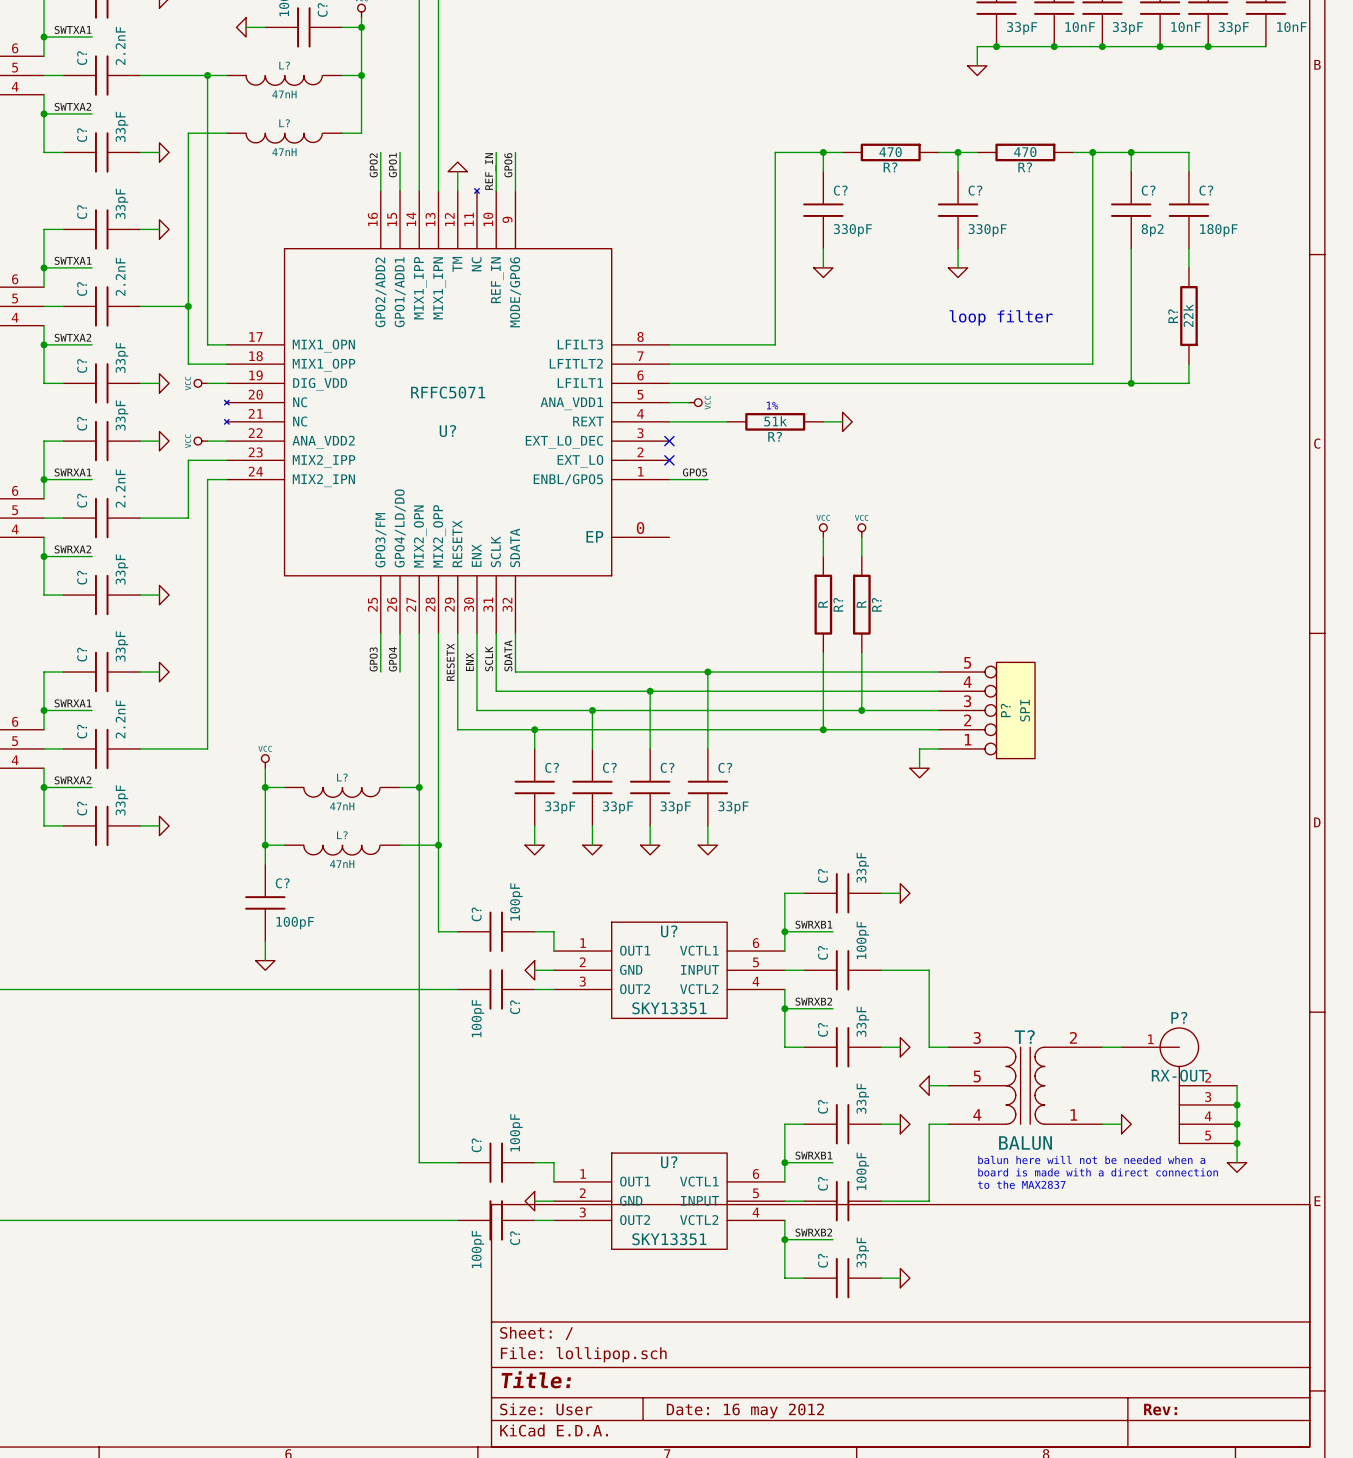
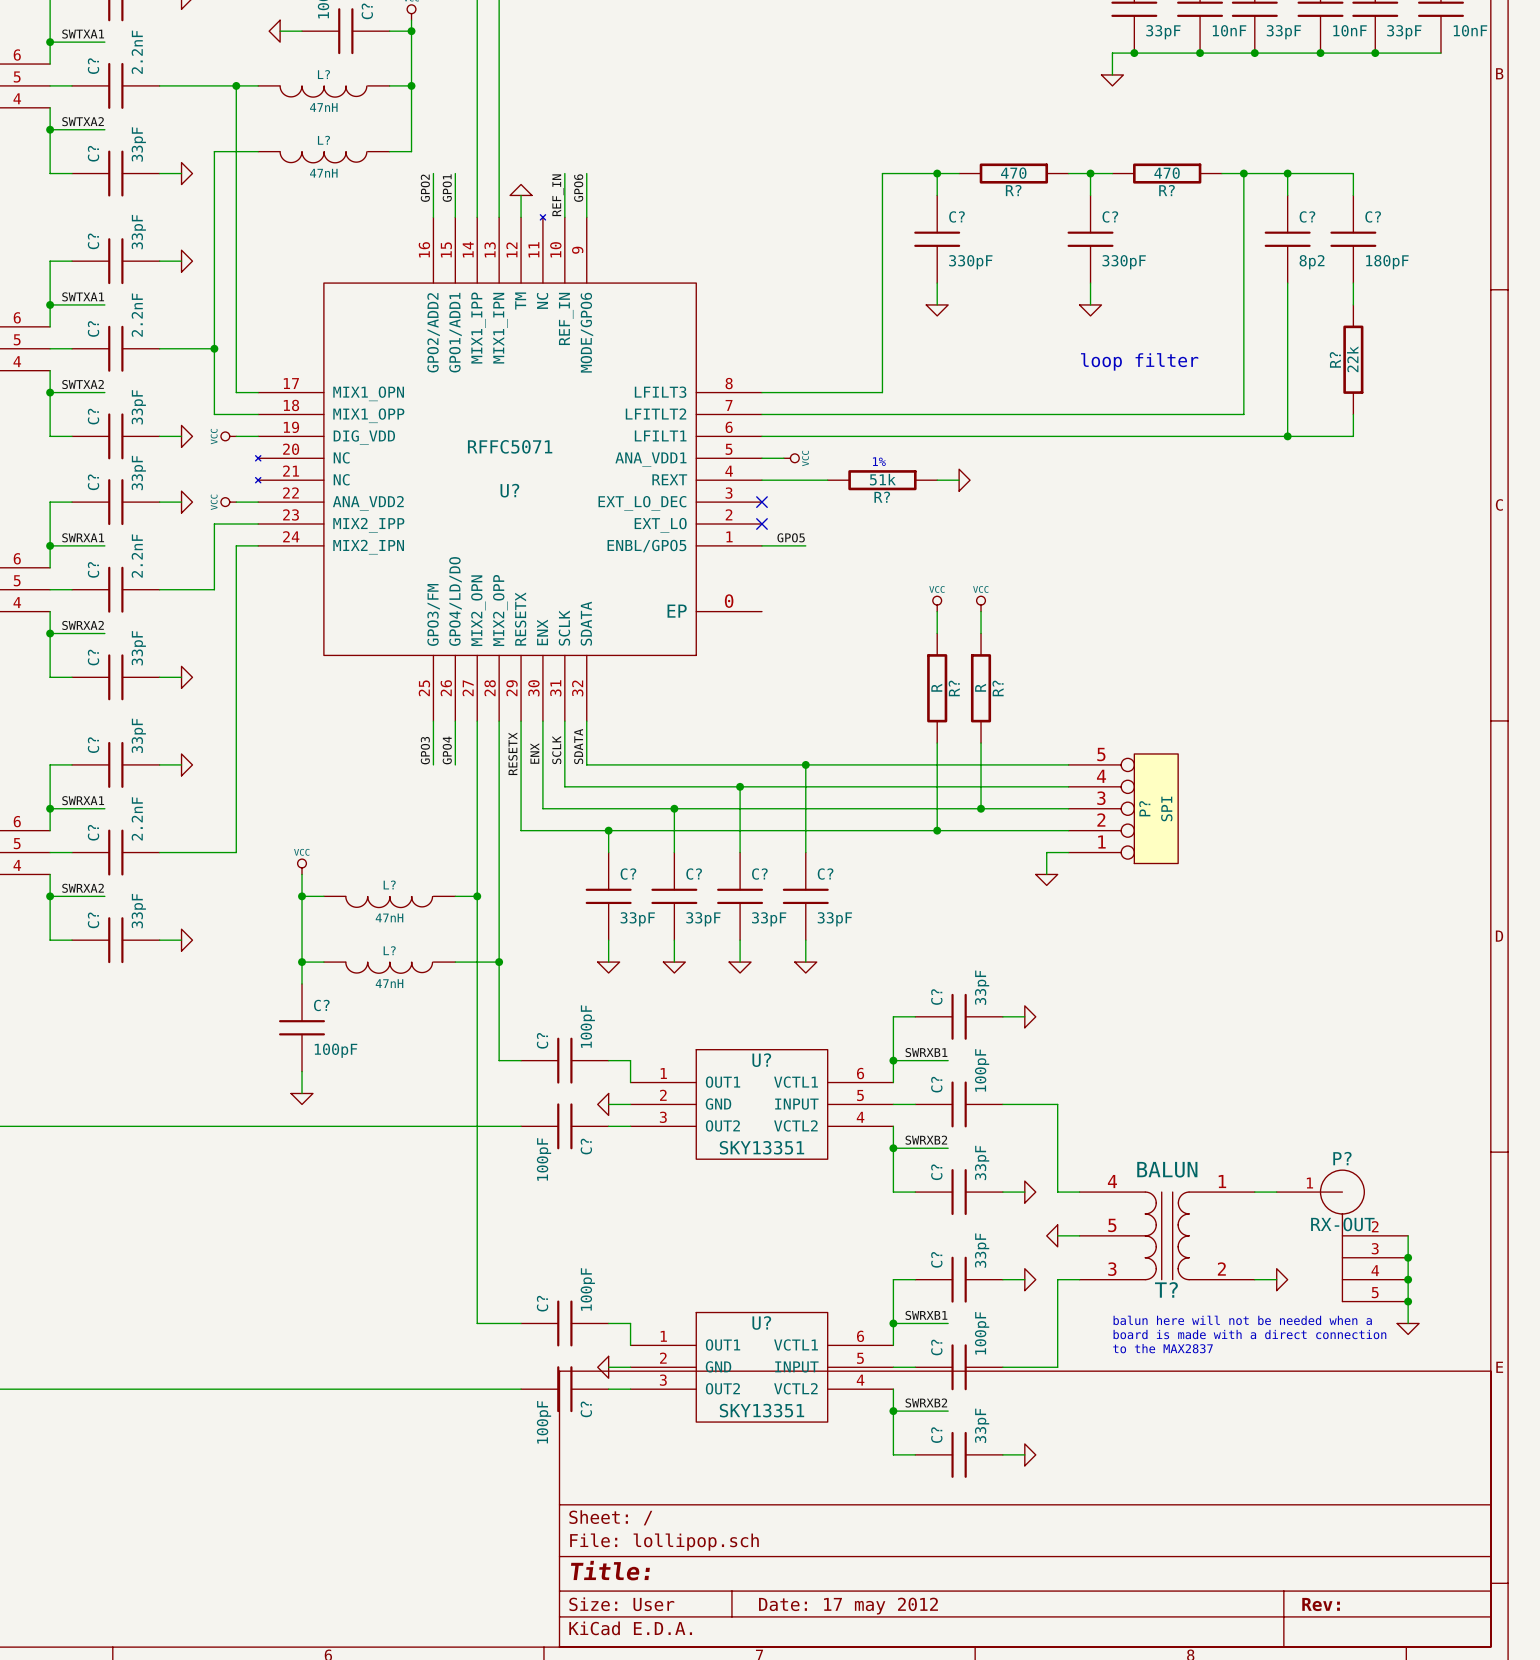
T? flip: as is (1025, 1085) -> up-down (1167, 1235)
title block: Date: 16 may 2012 (745, 1410) -> Date: 17 may 2012 (848, 1606)

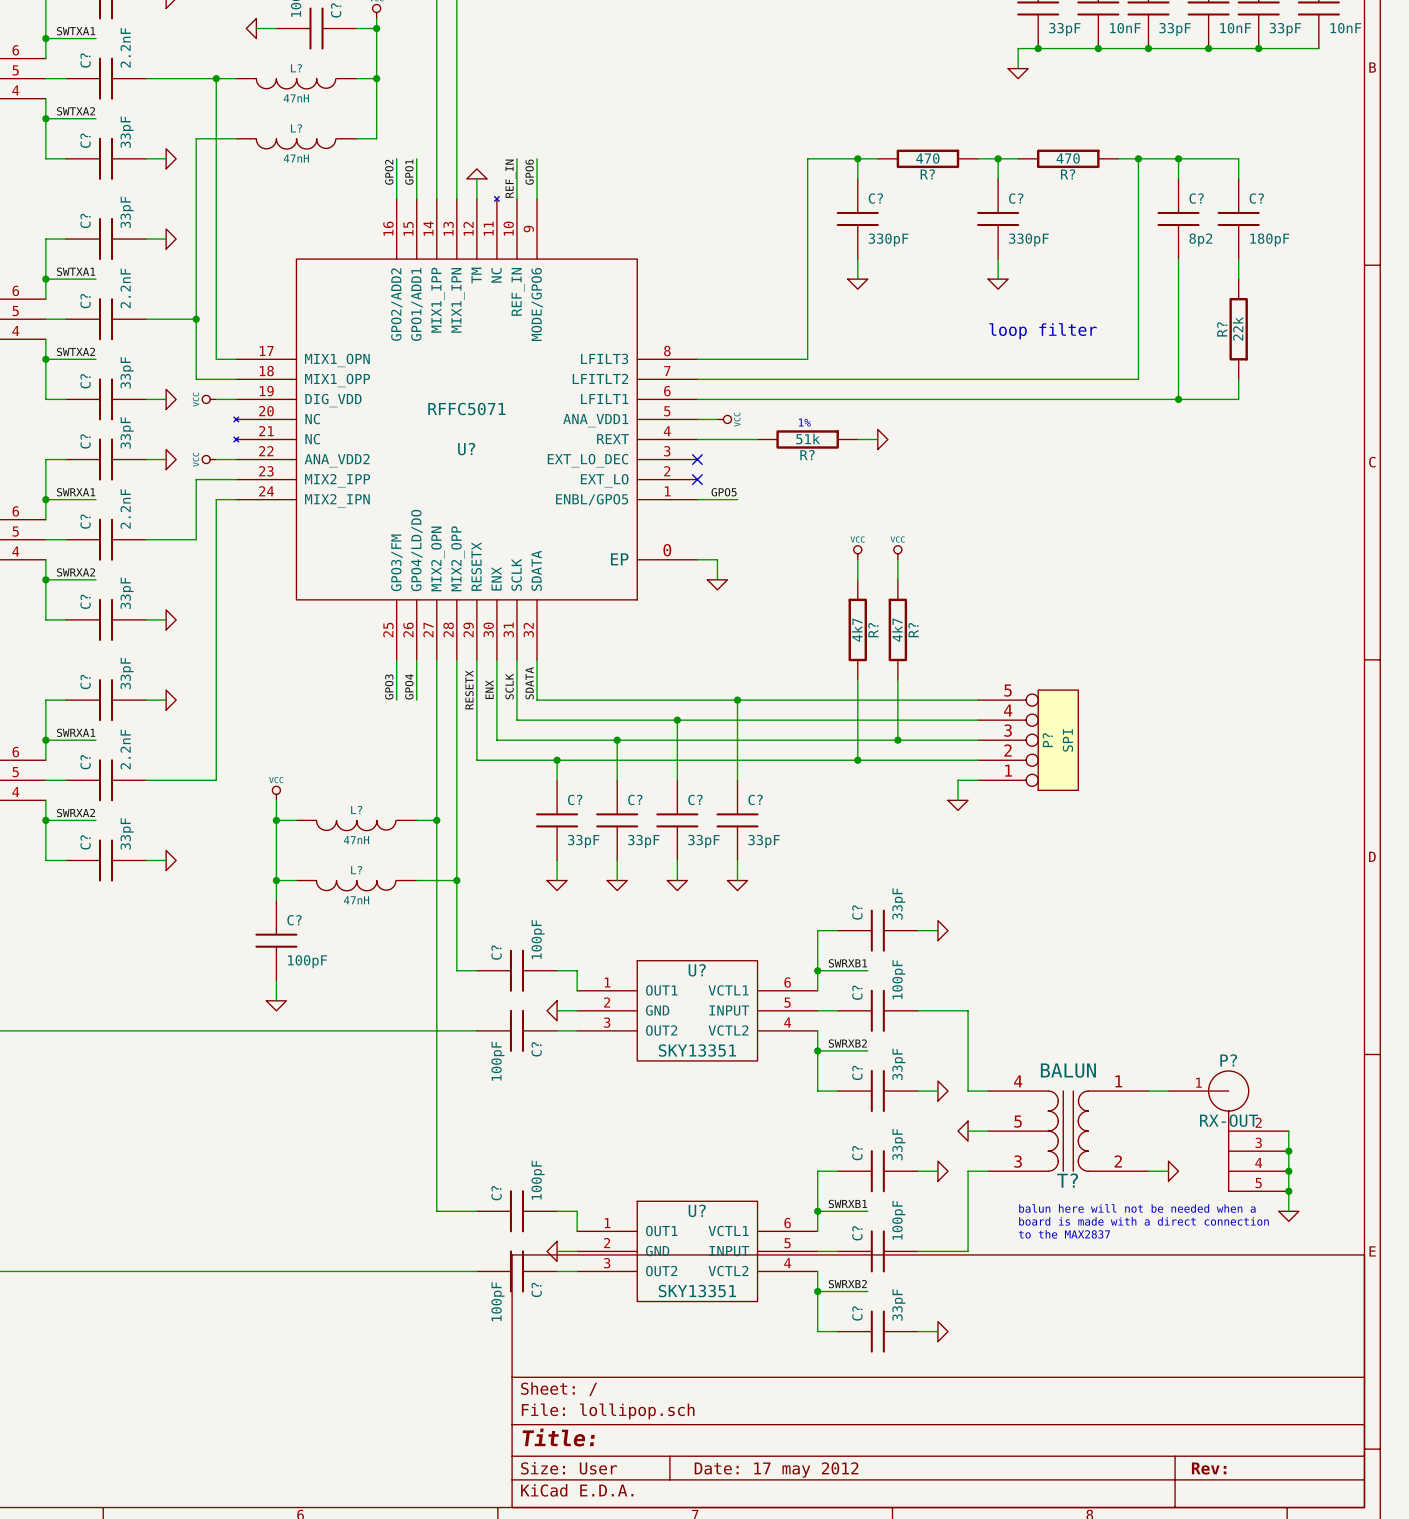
wire: none -> (697, 559) (717, 559) (717, 579)
power symbol: none -> (717, 584)
R? value: R (936, 687) -> 4k7 (857, 630)
R? value: R (980, 687) -> 4k7 (897, 630)

